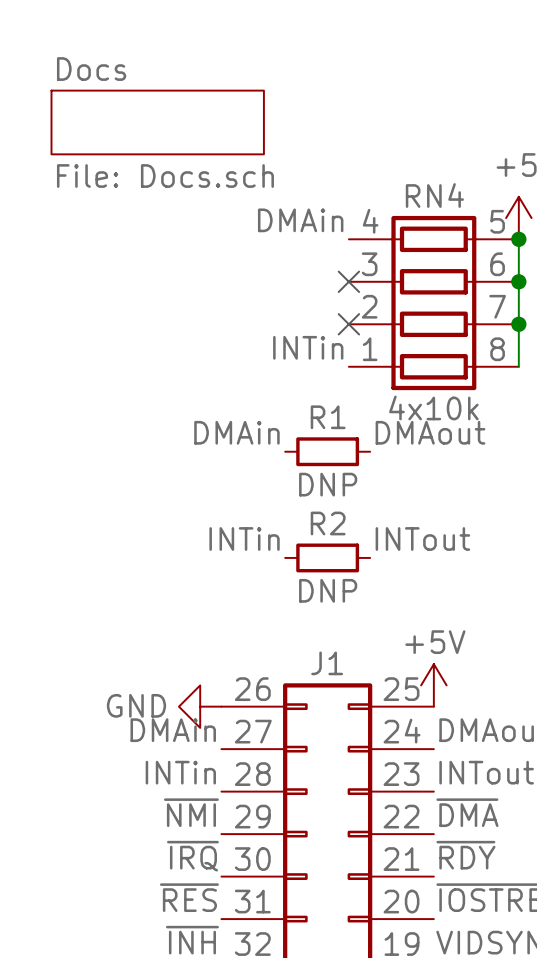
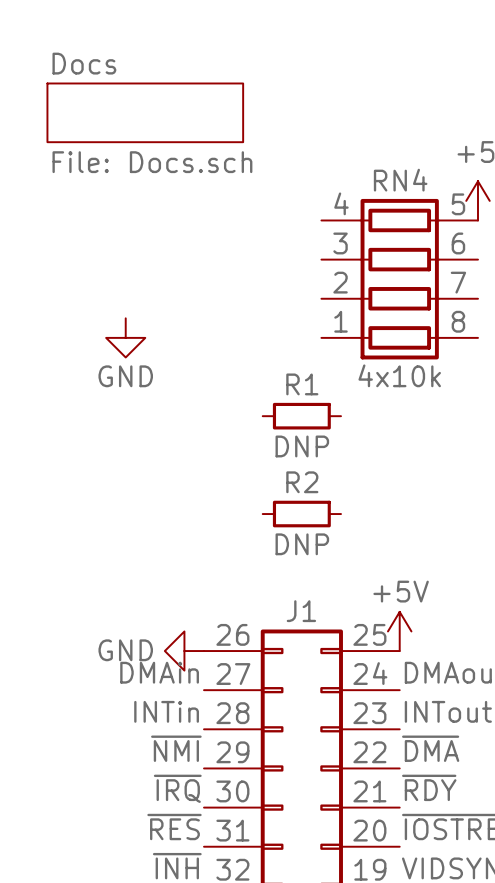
label: DMAin (300, 220) -> none
wire: (518, 239) (518, 366) -> none
junction: (518, 239) -> none
no-connect mark: (348, 281) -> none
junction: (518, 281) -> none
no-connect mark: (348, 324) -> none
junction: (518, 324) -> none
label: INTin (308, 347) -> none
power symbol: none -> GND (125, 337)
label: DMAin (236, 432) -> none
label: DMAout (430, 432) -> none
label: INTin (244, 538) -> none
label: INTout (422, 538) -> none

